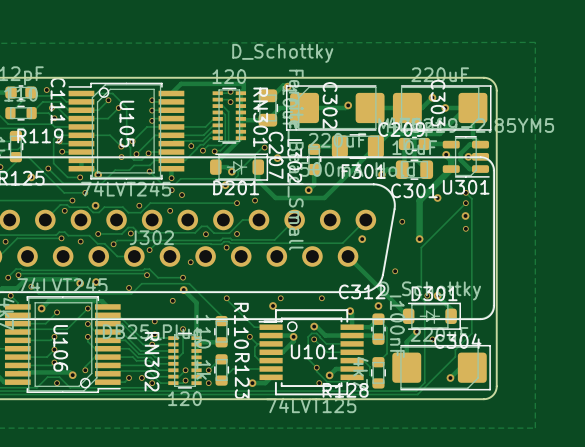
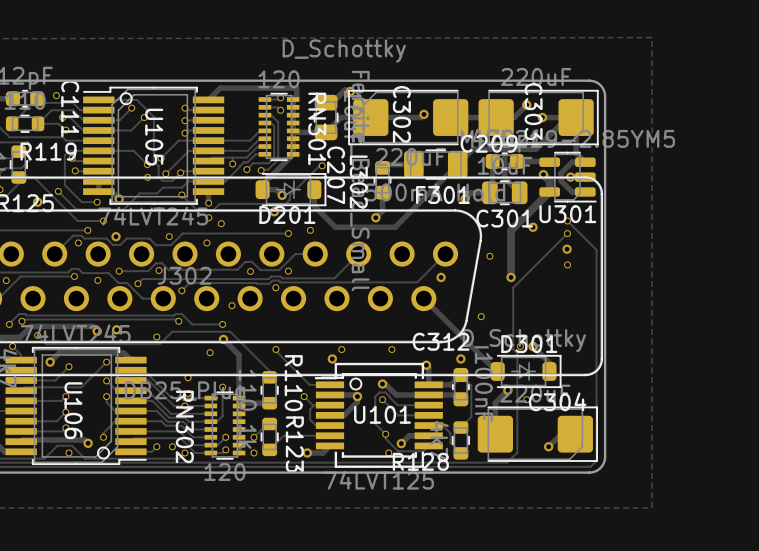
via: (277, 158) -> none
track: (471, 198) (471, 333) (455, 349) (455, 356) (417, 394) -> (574, 228) (596, 250) (596, 460) (590, 466) (587, 466) (508, 466)

